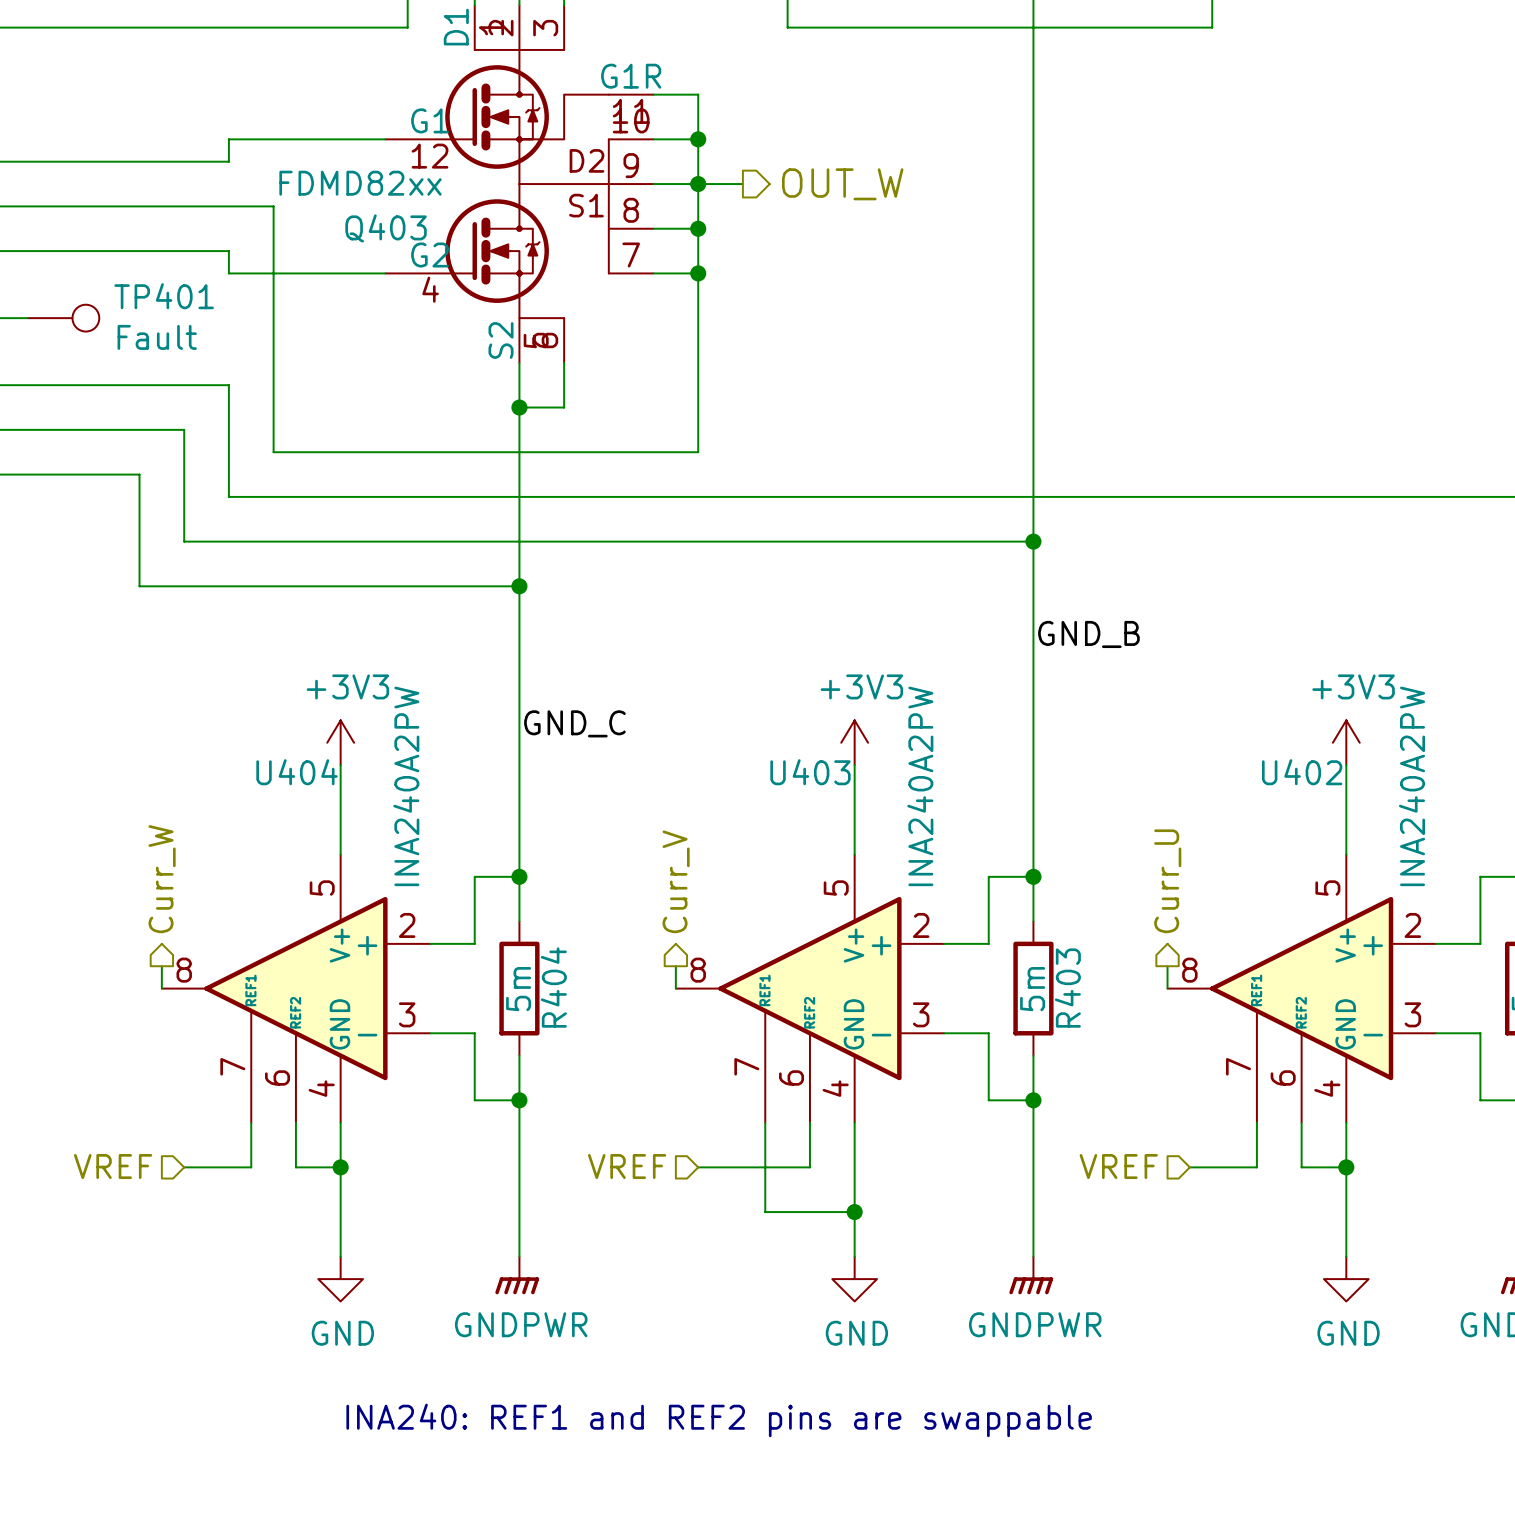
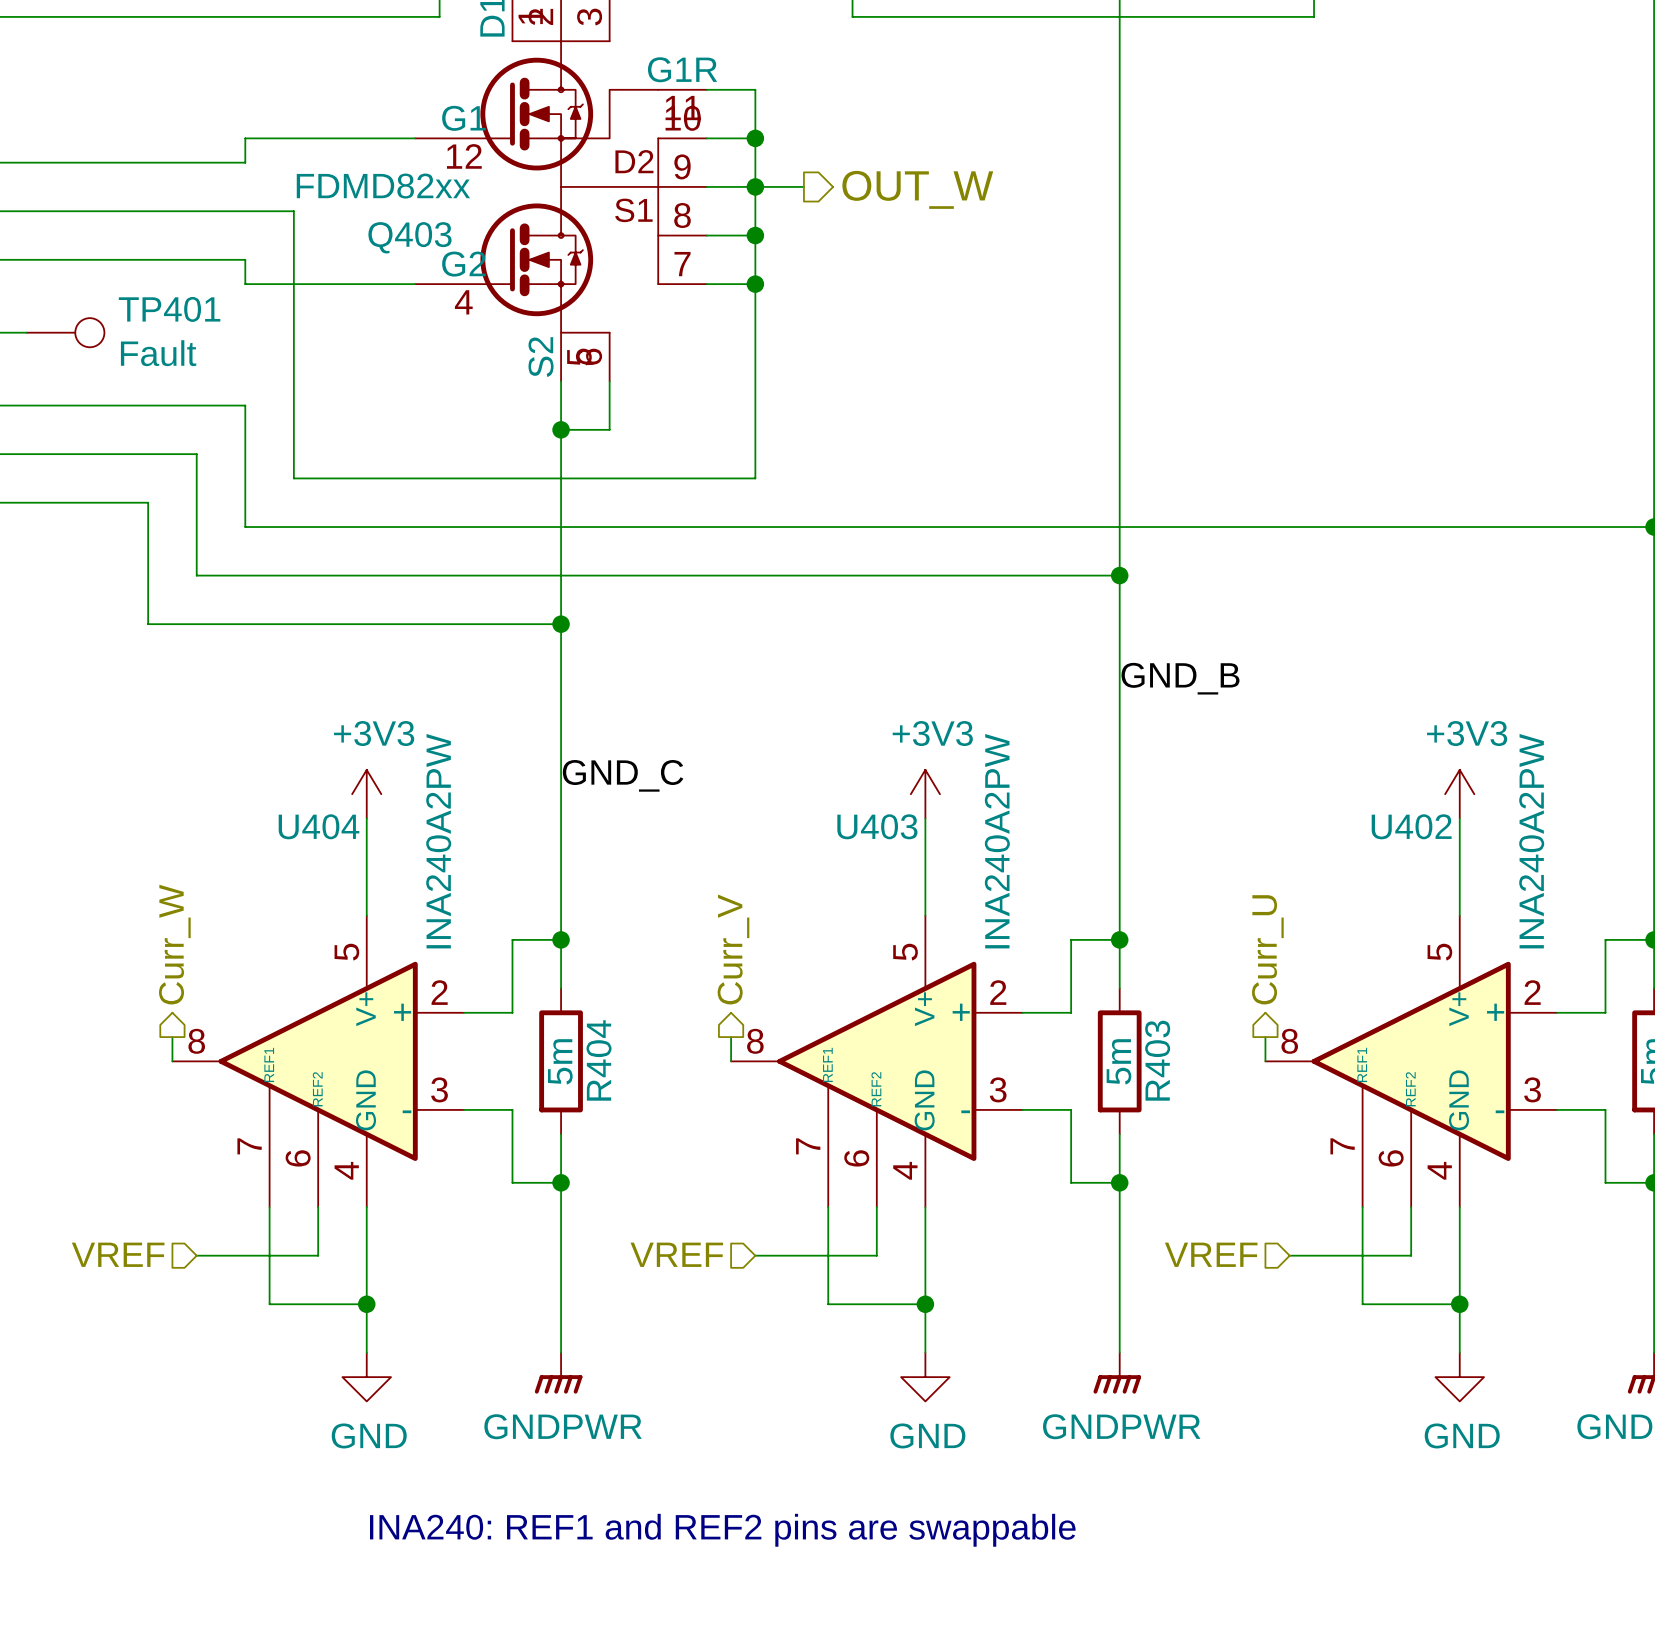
wire: (295, 1167) (340, 1167) -> (318, 1255) (269, 1255) (269, 1304) (366, 1304)
junction position: (340, 1167) -> (366, 1304)
wire: (1301, 1167) (1346, 1167) -> (1411, 1255) (1362, 1255) (1362, 1304) (1459, 1304)
junction position: (1346, 1167) -> (1459, 1304)

